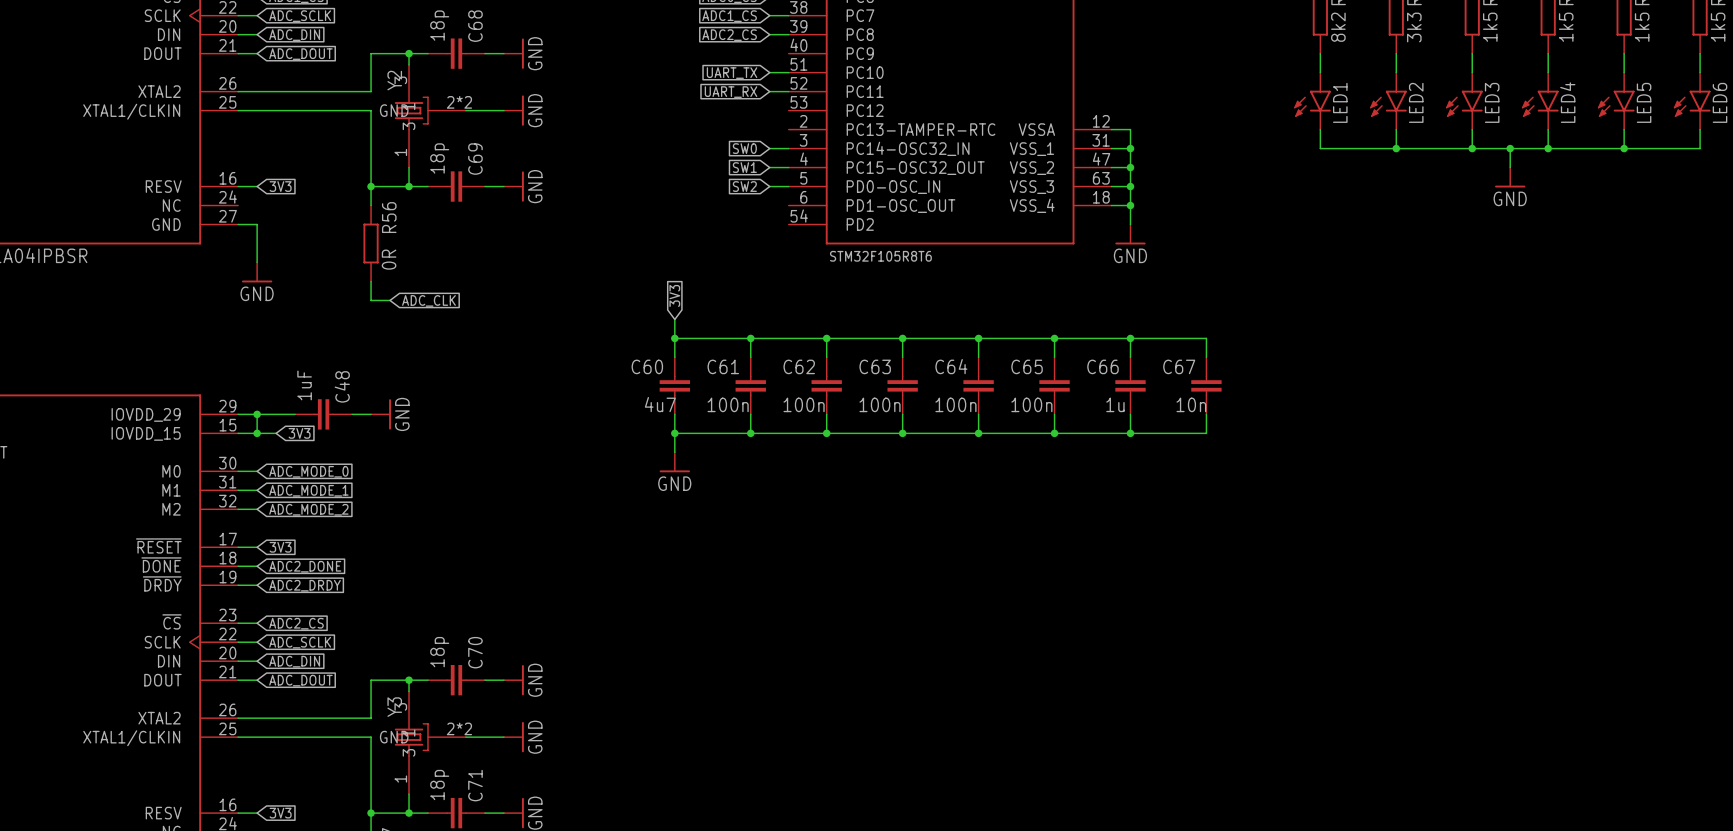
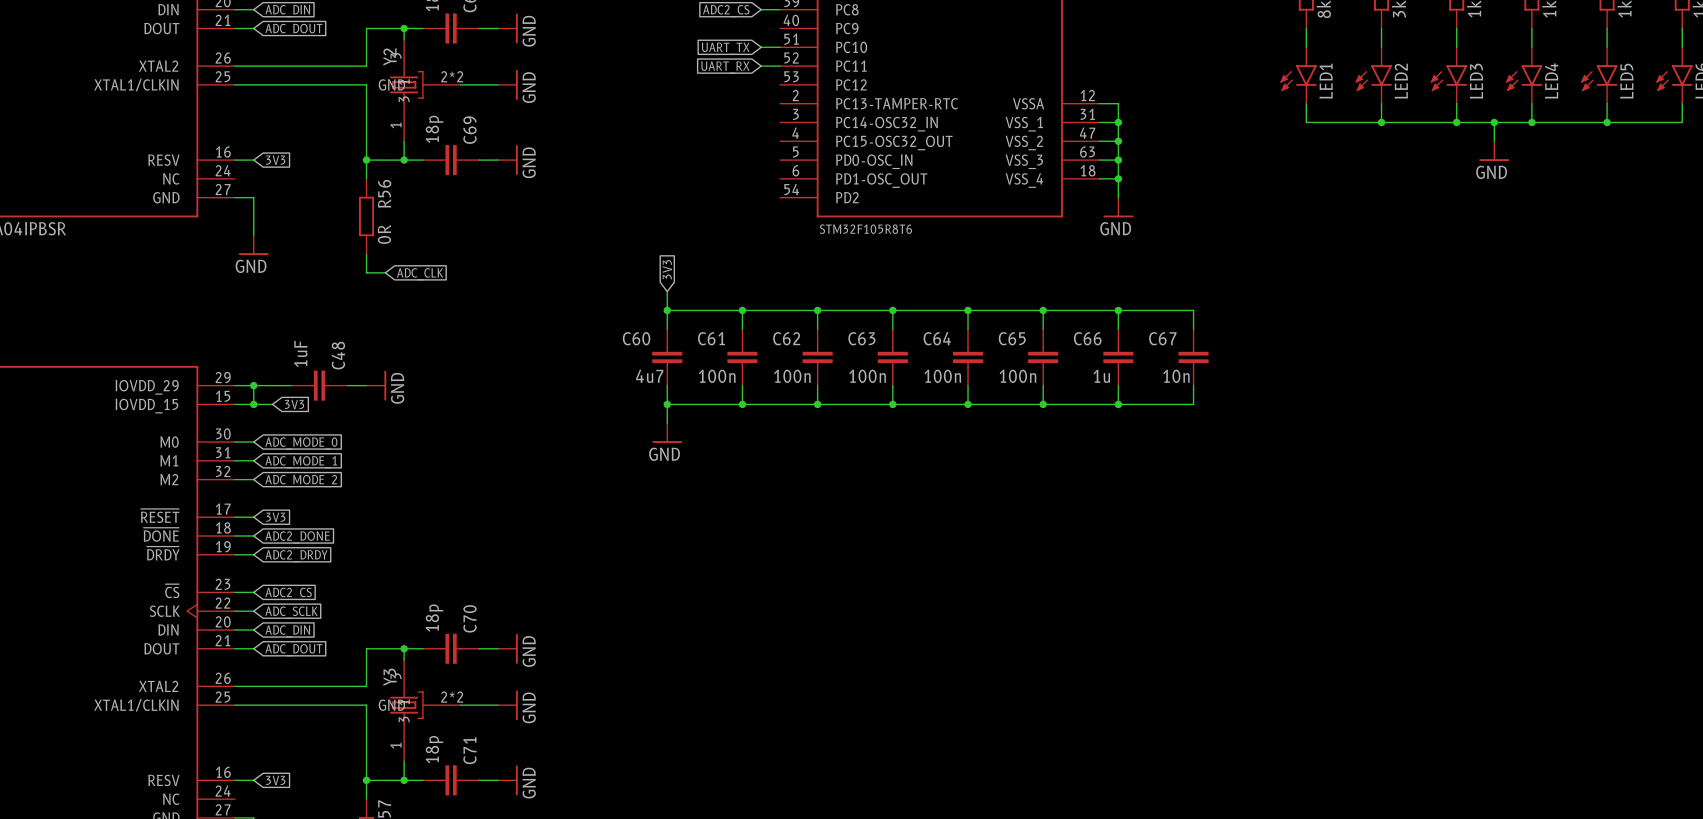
global label: SW0 (744, 148) -> none
wire: (769, 148) (788, 148) -> none
global label: SW1 (744, 167) -> none
wire: (769, 167) (788, 167) -> none
global label: SW2 (744, 186) -> none
wire: (769, 186) (788, 186) -> none

